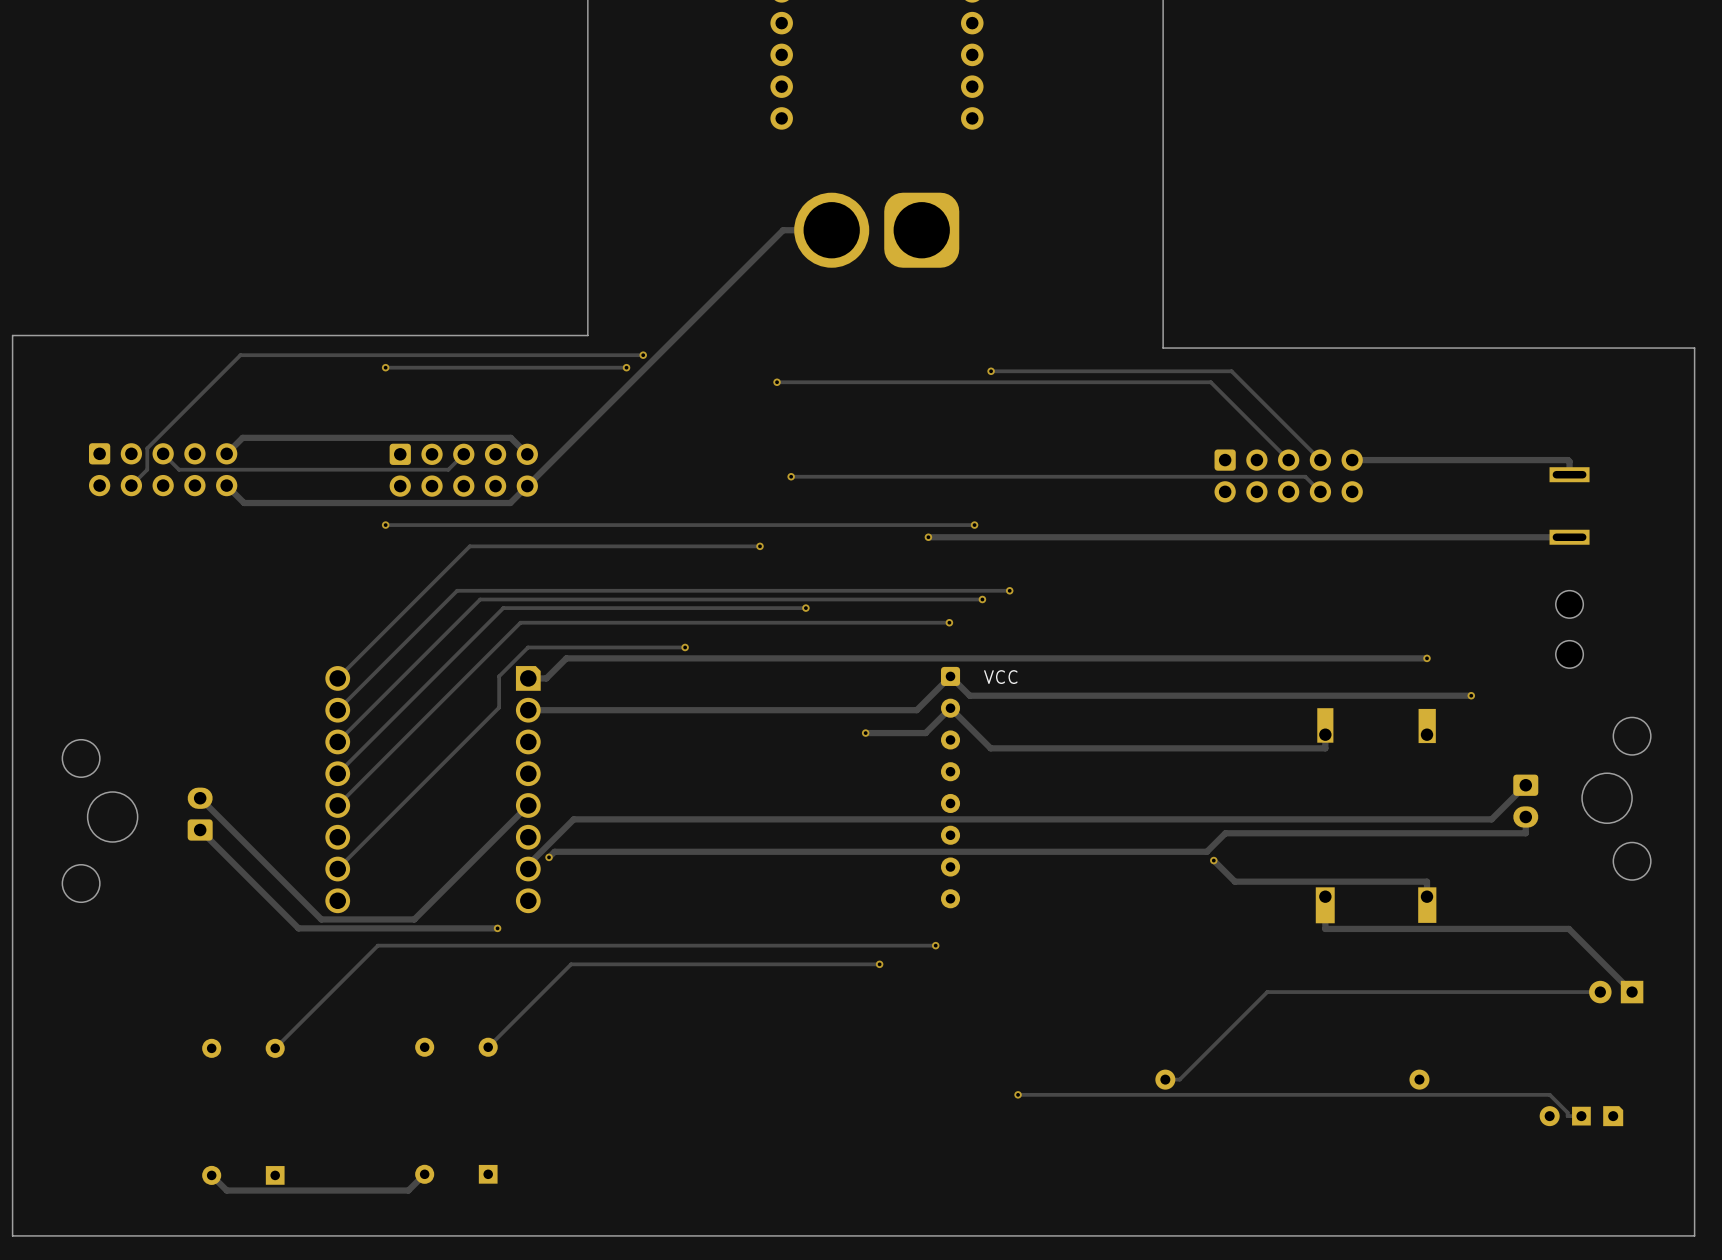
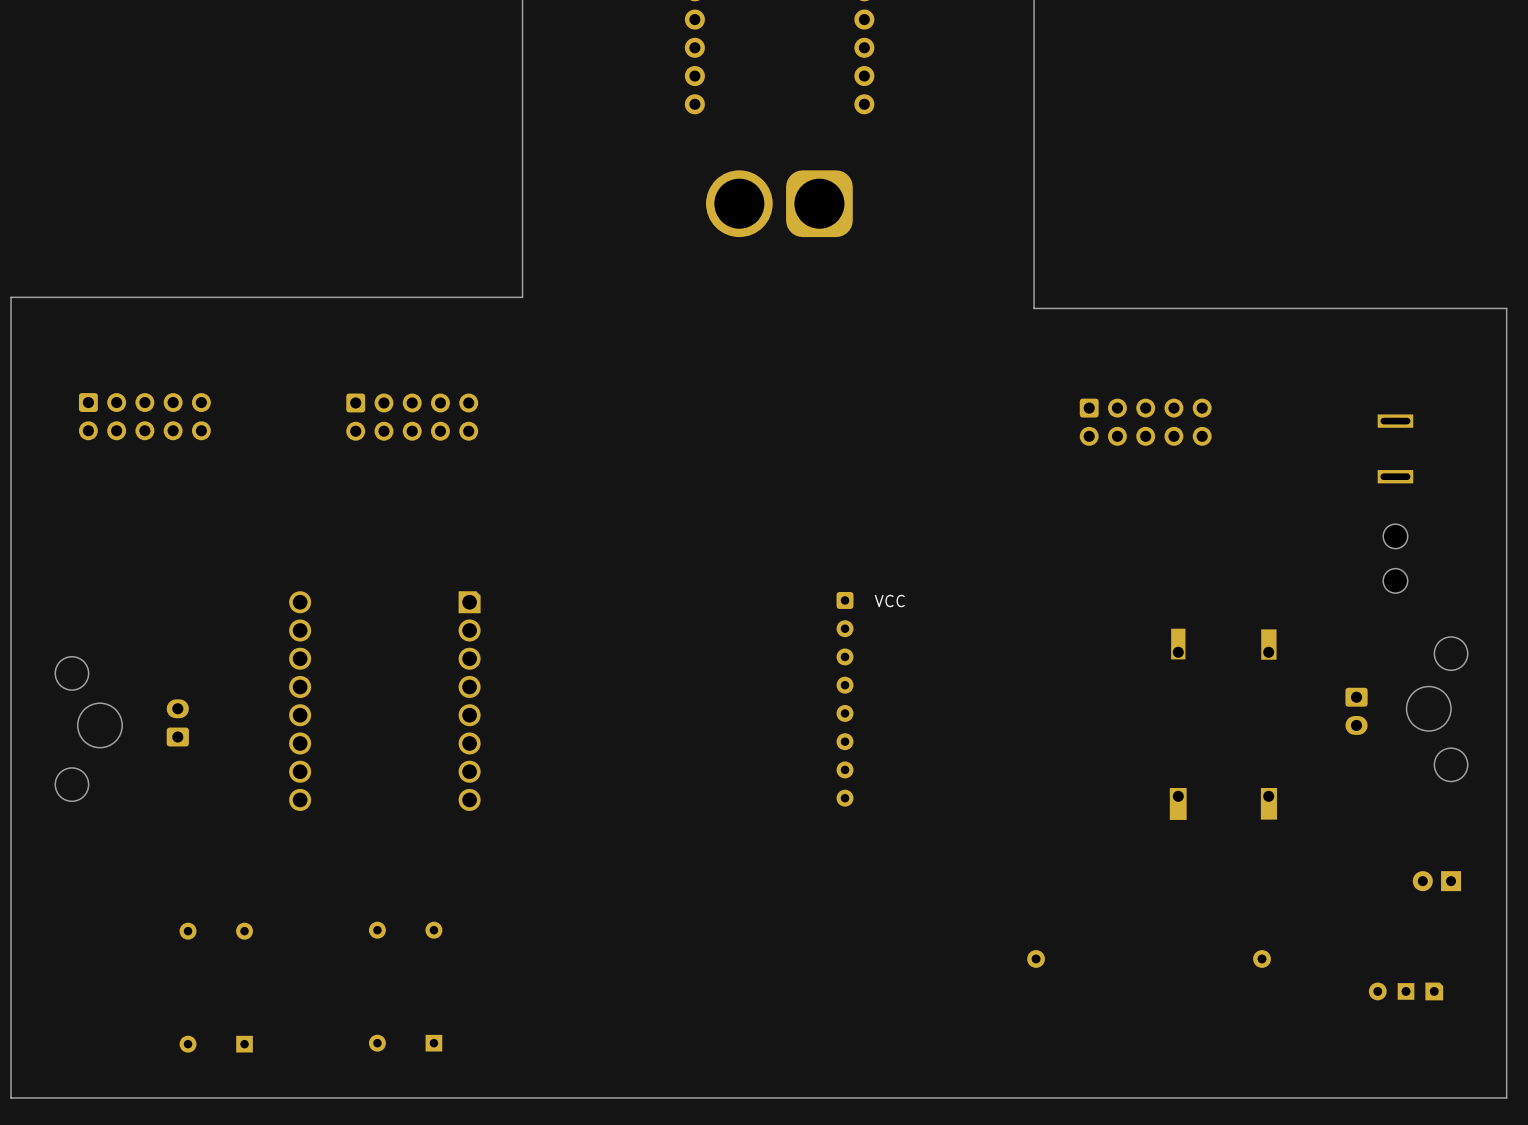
track: (831, 230) (783, 230) (510, 503) (244, 503) (226, 485) -> none
track: (643, 355) (240, 355) (147, 448) (147, 469) (131, 485) -> none
via: (643, 355) -> none
via: (385, 367) -> none
track: (626, 367) (385, 367) -> none
via: (626, 367) -> none
track: (991, 371) (1231, 371) (1320, 460) -> none
via: (991, 371) -> none
track: (777, 382) (1210, 382) (1288, 460) -> none
via: (777, 382) -> none
track: (163, 453) (179, 469) (448, 469) (463, 454) -> none
track: (226, 453) (242, 437) (510, 437) (527, 454) -> none
track: (1352, 460) (1568, 460) (1569, 474) -> none
track: (791, 476) (1305, 476) (1320, 491) -> none
via: (791, 476) -> none
via: (385, 525) -> none
track: (974, 525) (385, 525) -> none
via: (974, 525) -> none
via: (928, 537) -> none
track: (1569, 537) (928, 537) -> none
track: (760, 546) (469, 546) (337, 678) -> none
via: (760, 546) -> none
track: (1009, 590) (457, 590) (337, 710) -> none
via: (1009, 590) -> none
track: (982, 599) (480, 599) (337, 741) -> none
via: (982, 599) -> none
track: (805, 608) (503, 608) (337, 773) -> none
via: (805, 608) -> none
track: (949, 622) (520, 622) (337, 805) -> none
via: (949, 622) -> none
track: (685, 647) (528, 647) (499, 676) (499, 707) (337, 869) -> none
via: (685, 647) -> none
track: (1427, 658) (566, 658) (546, 678) (528, 678) -> none
via: (1427, 658) -> none
track: (1471, 695) (969, 695) (950, 676) (916, 710) (528, 710) -> none
via: (1471, 695) -> none
track: (865, 733) (925, 733) (950, 708) (990, 748) (1325, 748) (1325, 734) -> none
via: (865, 733) -> none
track: (1525, 785) (1491, 819) (573, 819) (528, 864) (528, 869) -> none
track: (200, 798) (321, 919) (414, 919) (528, 805) -> none
track: (1525, 816) (1525, 833) (1225, 833) (1206, 851) (554, 851) (549, 857) -> none
track: (200, 830) (298, 928) (497, 928) -> none
via: (549, 857) -> none
track: (1213, 860) (1234, 881) (1427, 881) (1427, 896) -> none
via: (1213, 860) -> none
track: (1325, 896) (1325, 928) (1568, 928) (1632, 992) -> none
via: (497, 928) -> none
track: (935, 945) (377, 945) (275, 1048) -> none
via: (935, 945) -> none
track: (879, 964) (571, 964) (488, 1047) -> none
via: (879, 964) -> none
track: (1600, 992) (1267, 992) (1179, 1079) (1165, 1079) -> none
track: (1018, 1094) (1549, 1094) (1567, 1112) (1567, 1116) (1581, 1116) -> none
via: (1018, 1094) -> none
track: (424, 1174) (408, 1190) (226, 1190) (211, 1175) -> none

